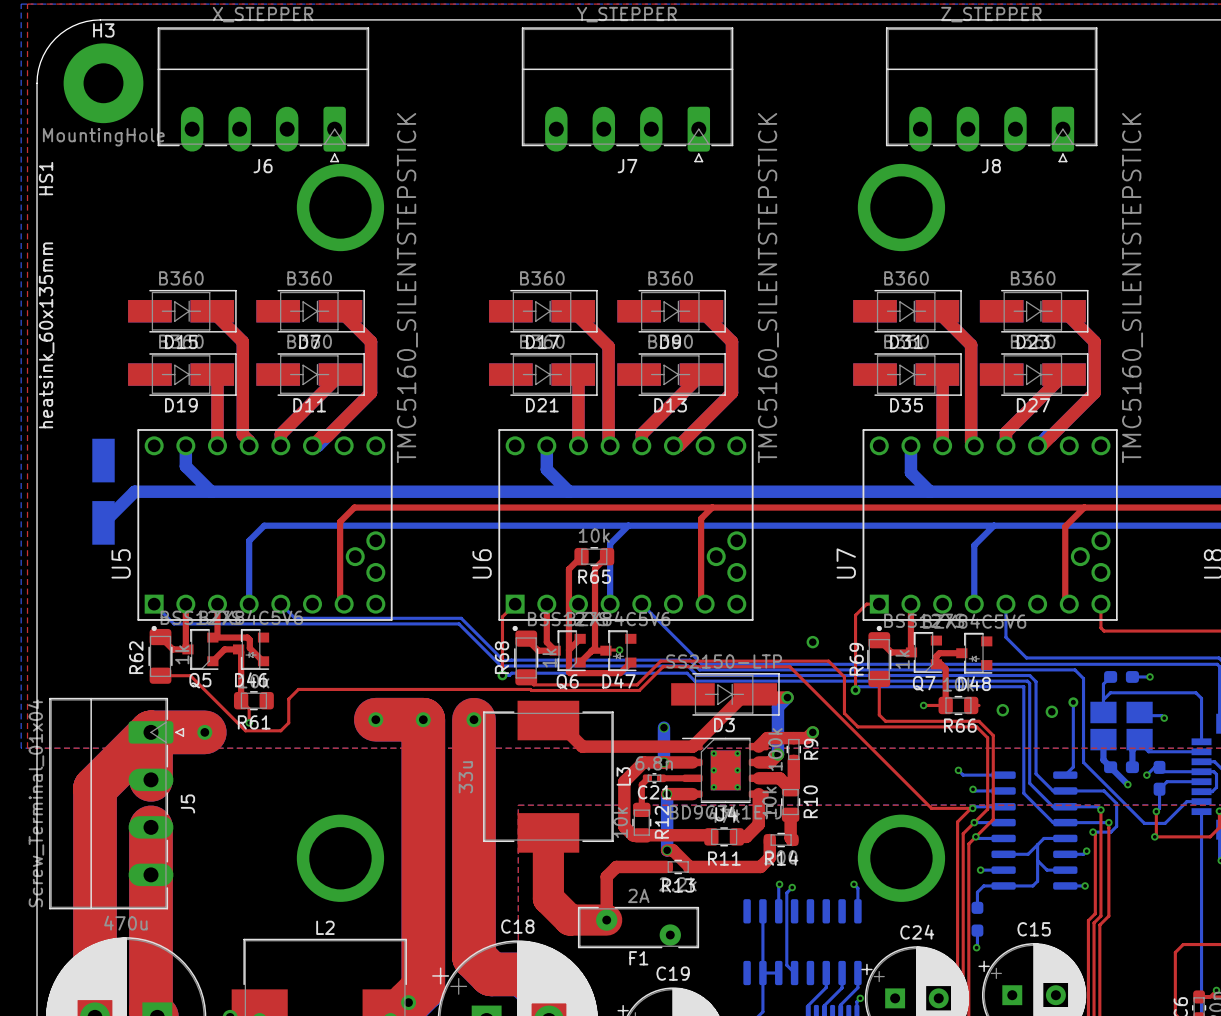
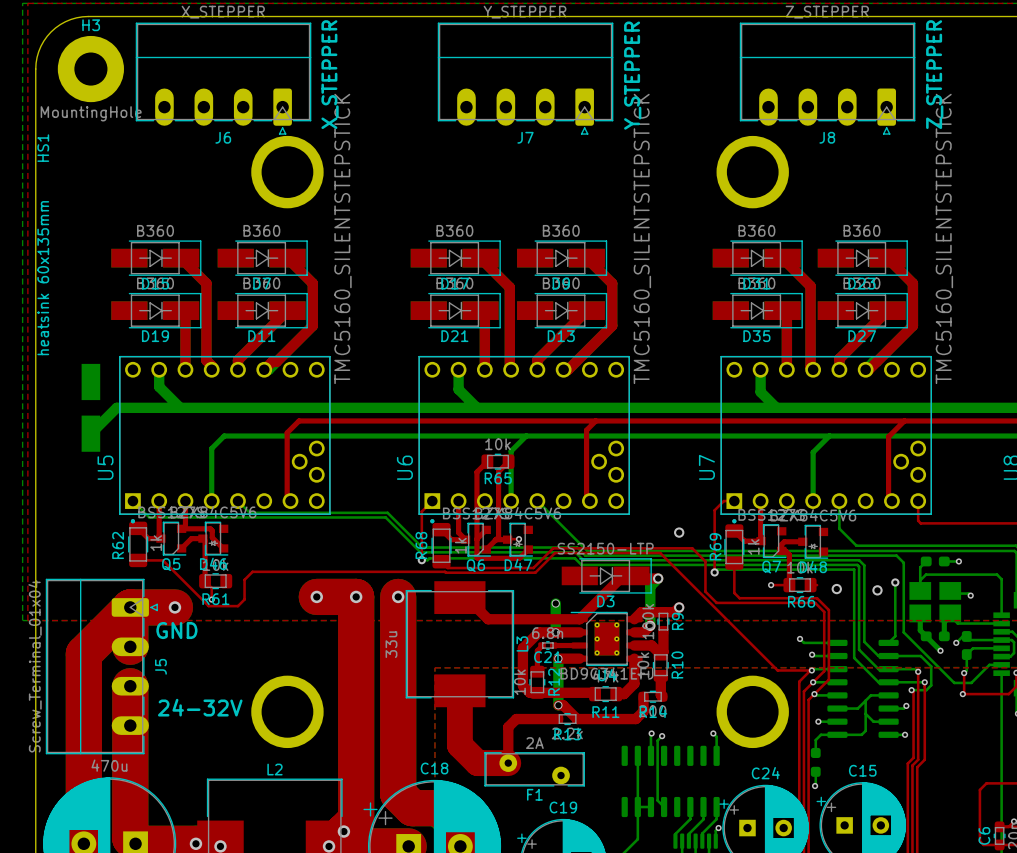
text: none -> X_STEPPER (330, 74)
text: none -> Z_STEPPER (934, 74)
text: none -> Y_STEPPER (632, 75)
HS1 value: heatsink_60x135mm (46, 335) -> heatsink 60x135mm (43, 278)
text: none -> GND (176, 630)
text: none -> 24-32V (200, 707)

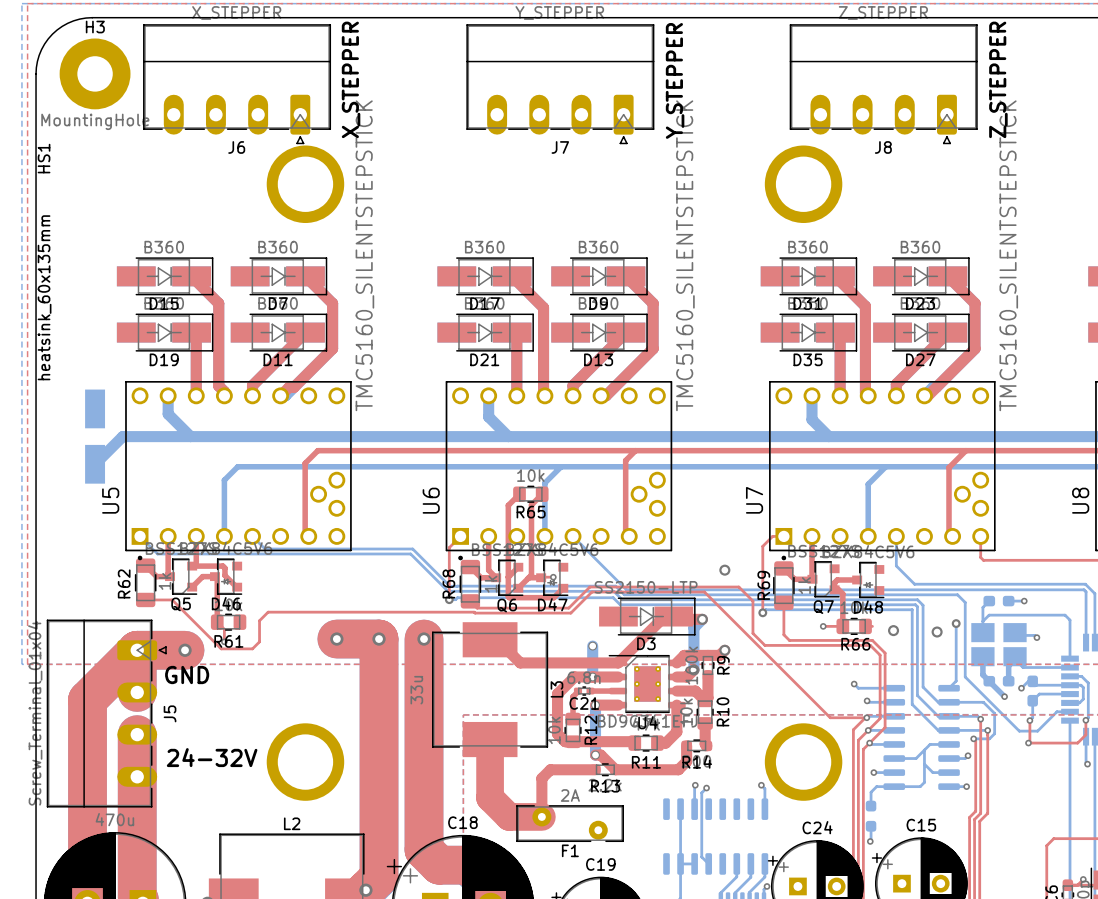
HS1 value: heatsink 60x135mm (43, 278) -> heatsink_60x135mm (44, 297)

